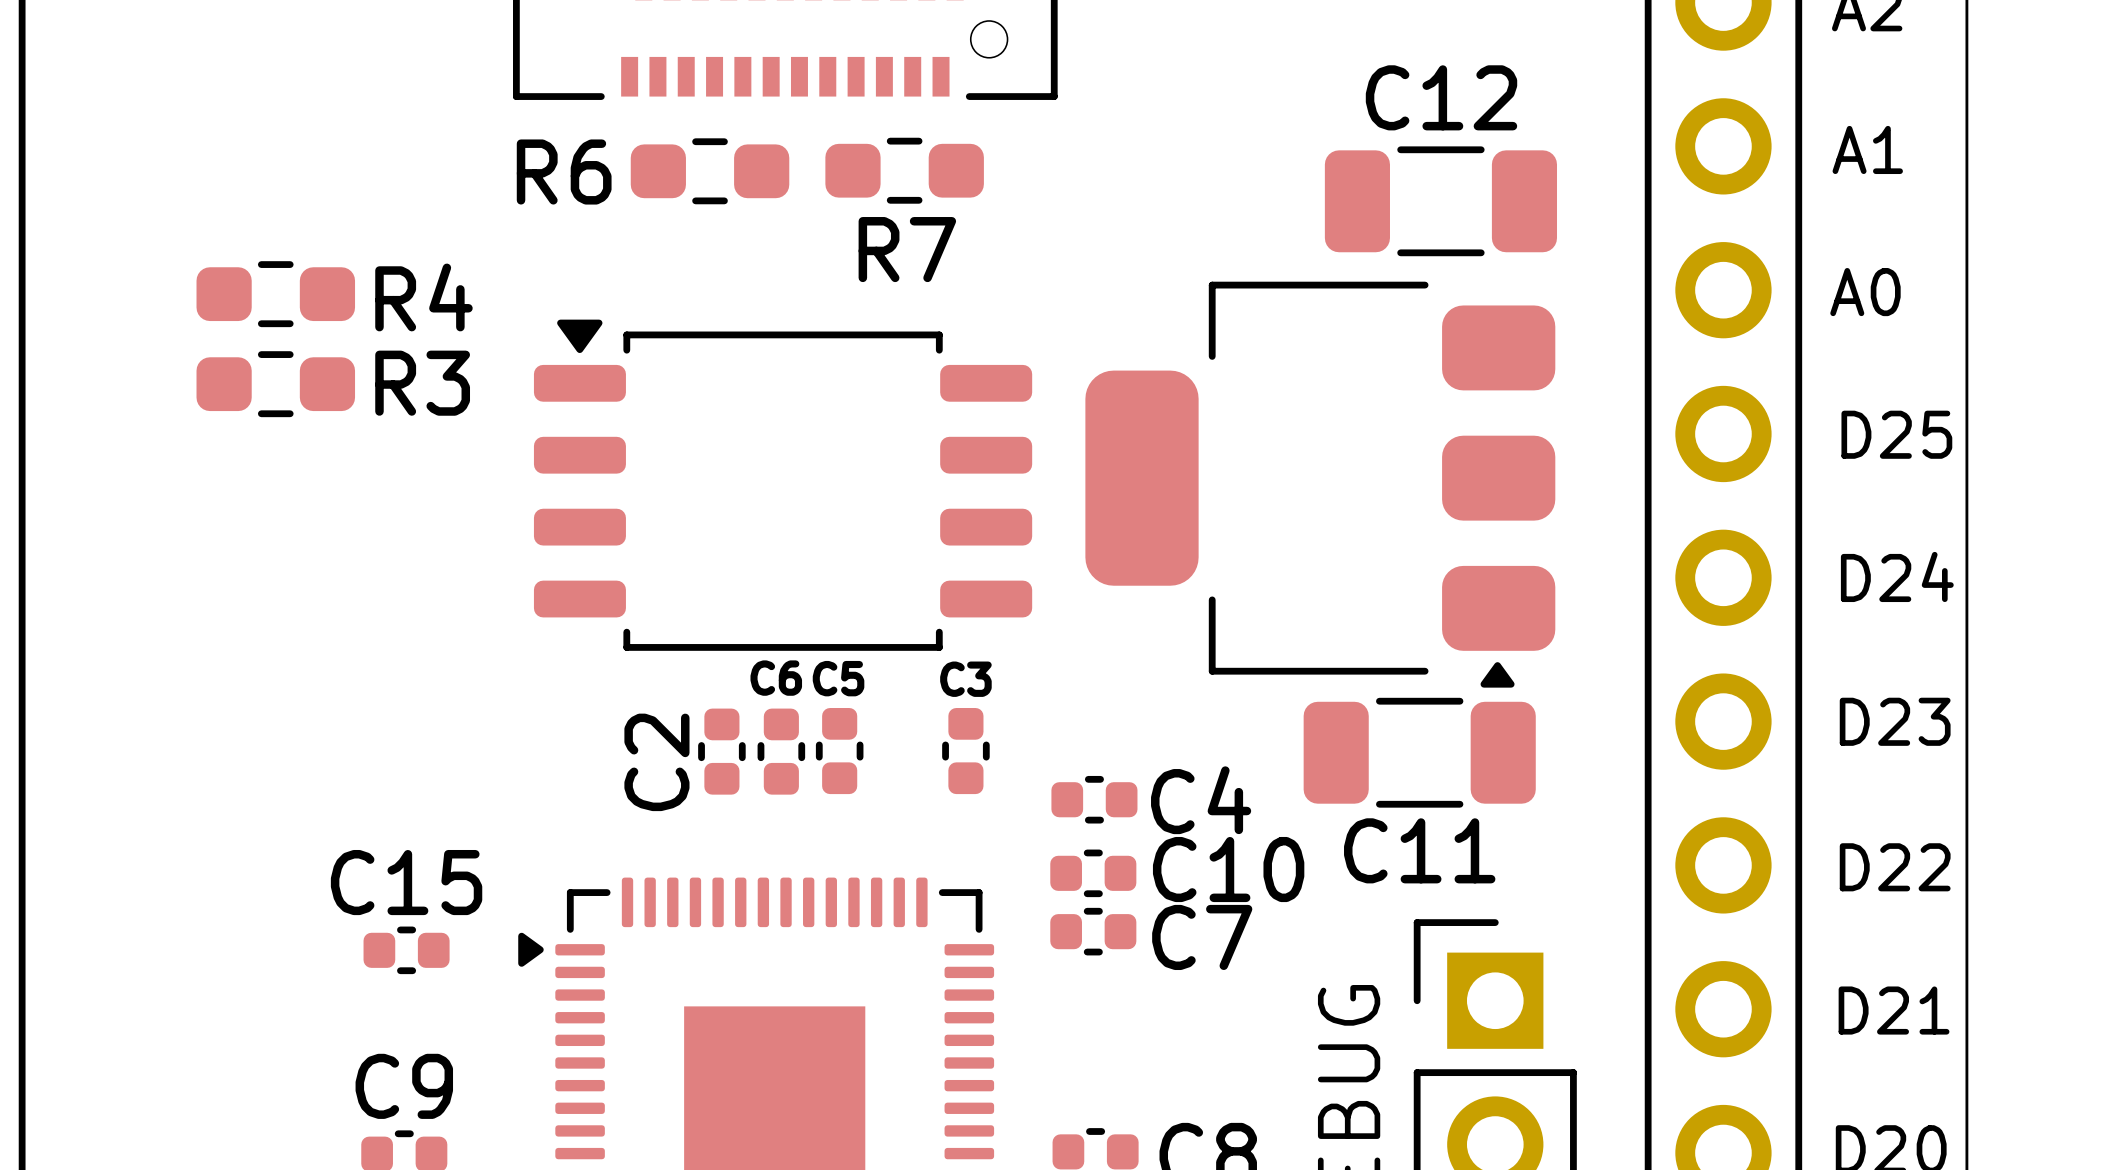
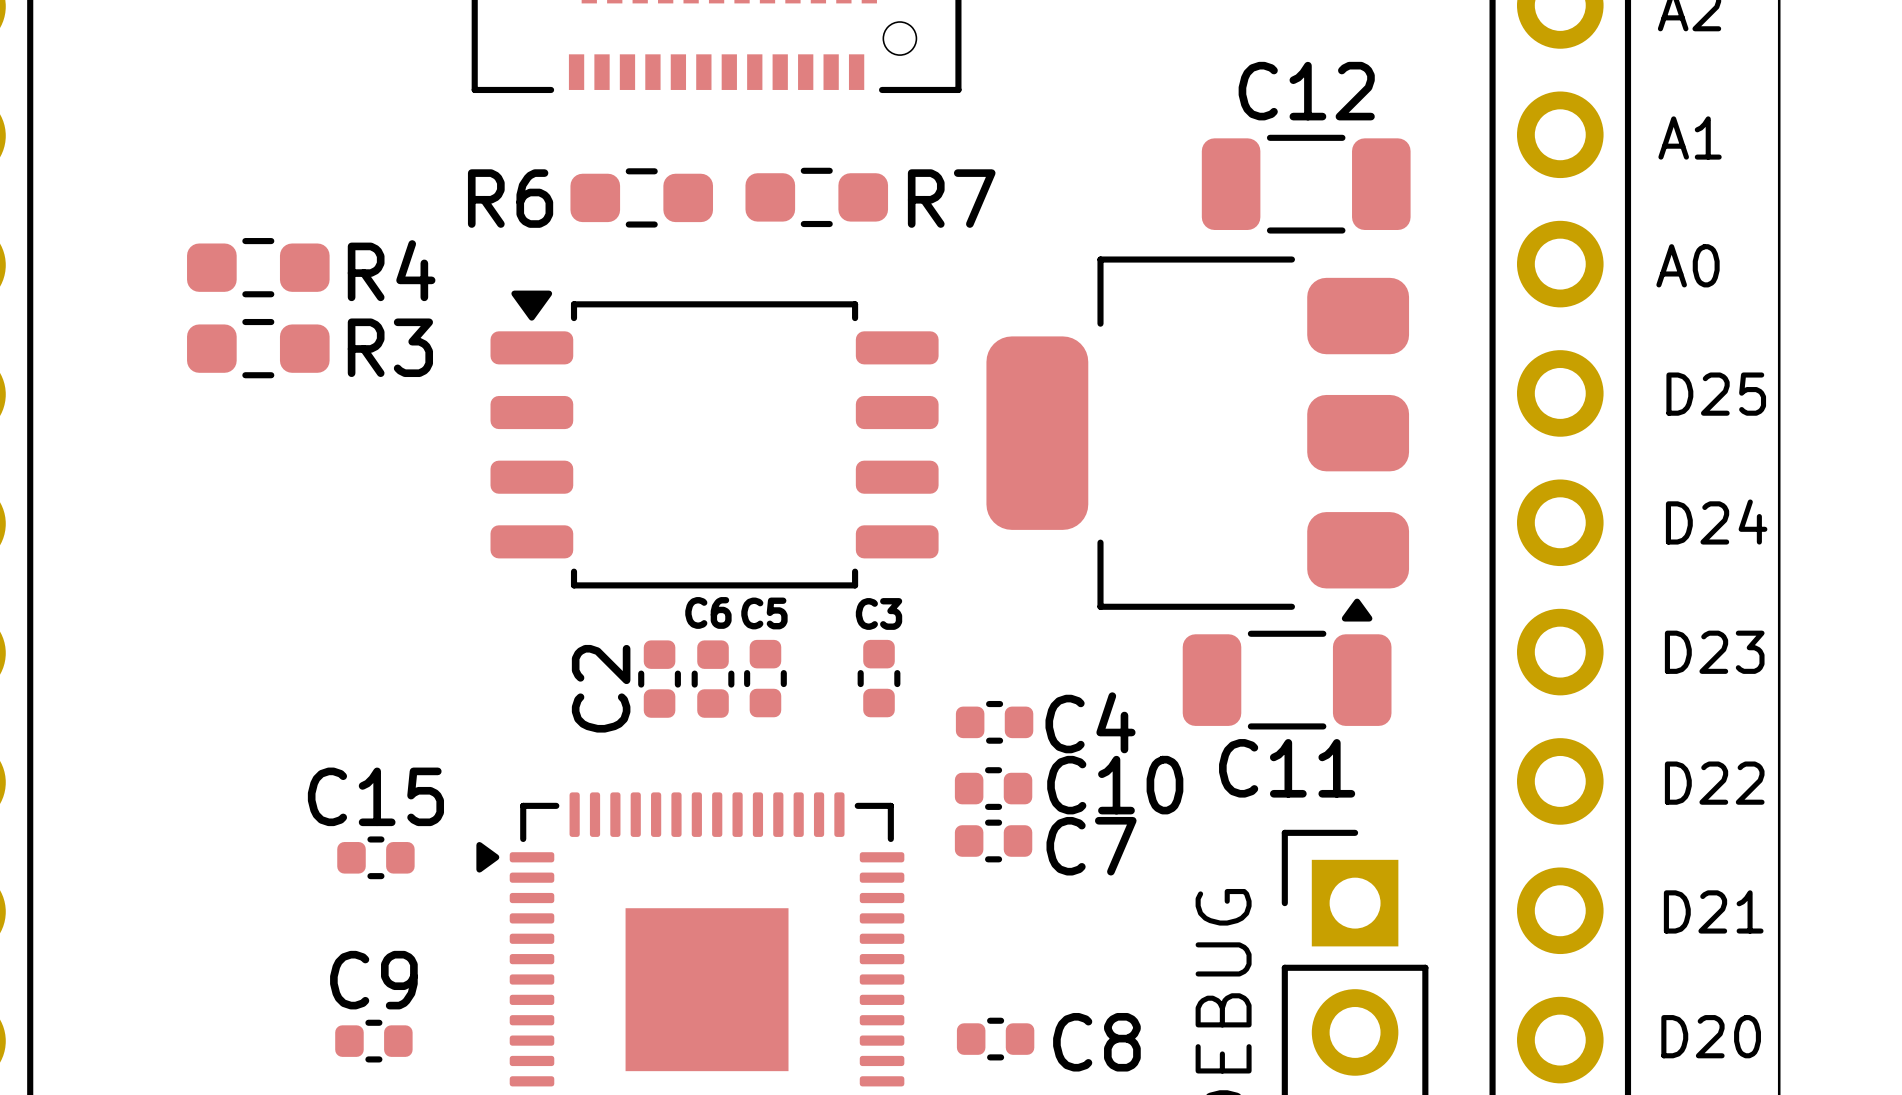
R7 position: (904, 170) -> (816, 197)
R6 position: (710, 171) -> (641, 197)
R7 name position: R7 (907, 249) -> R7 (951, 198)

